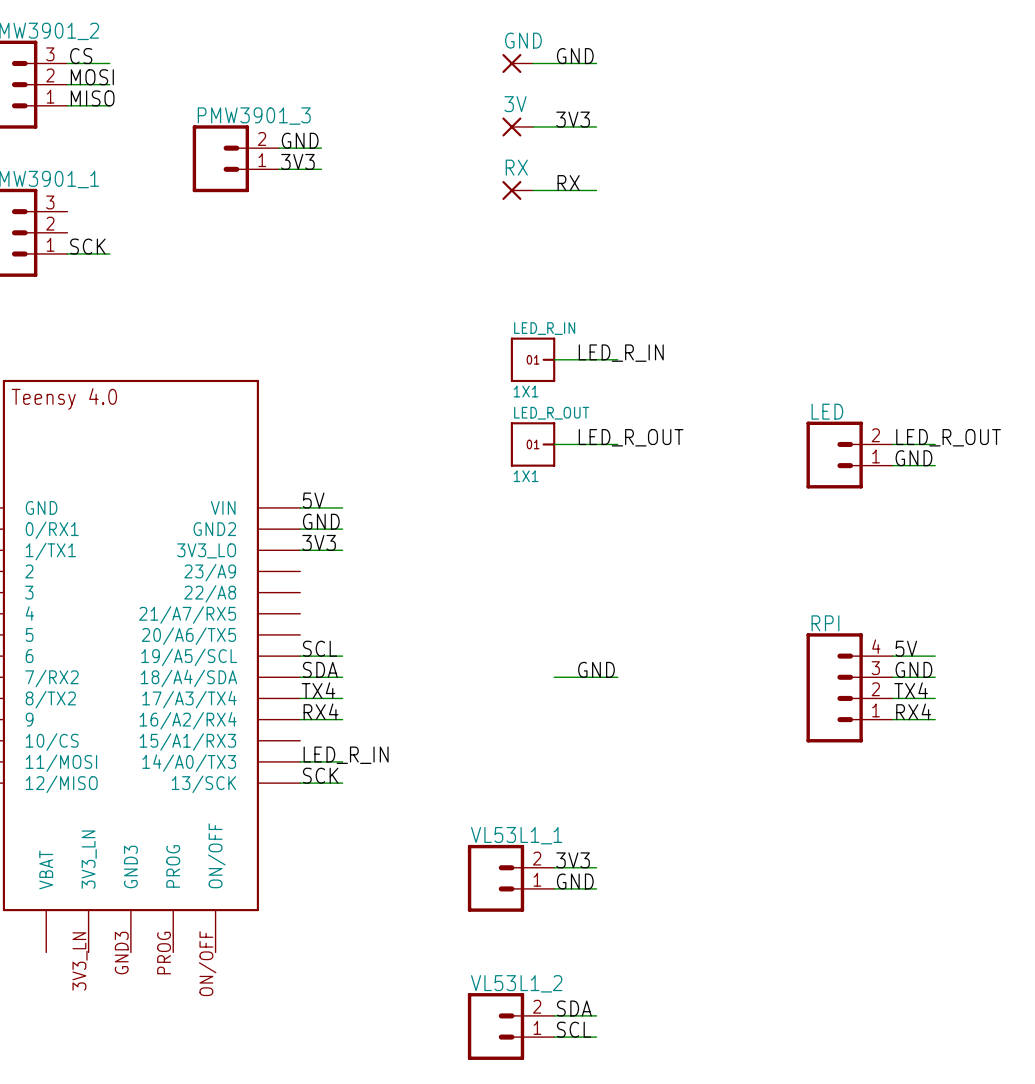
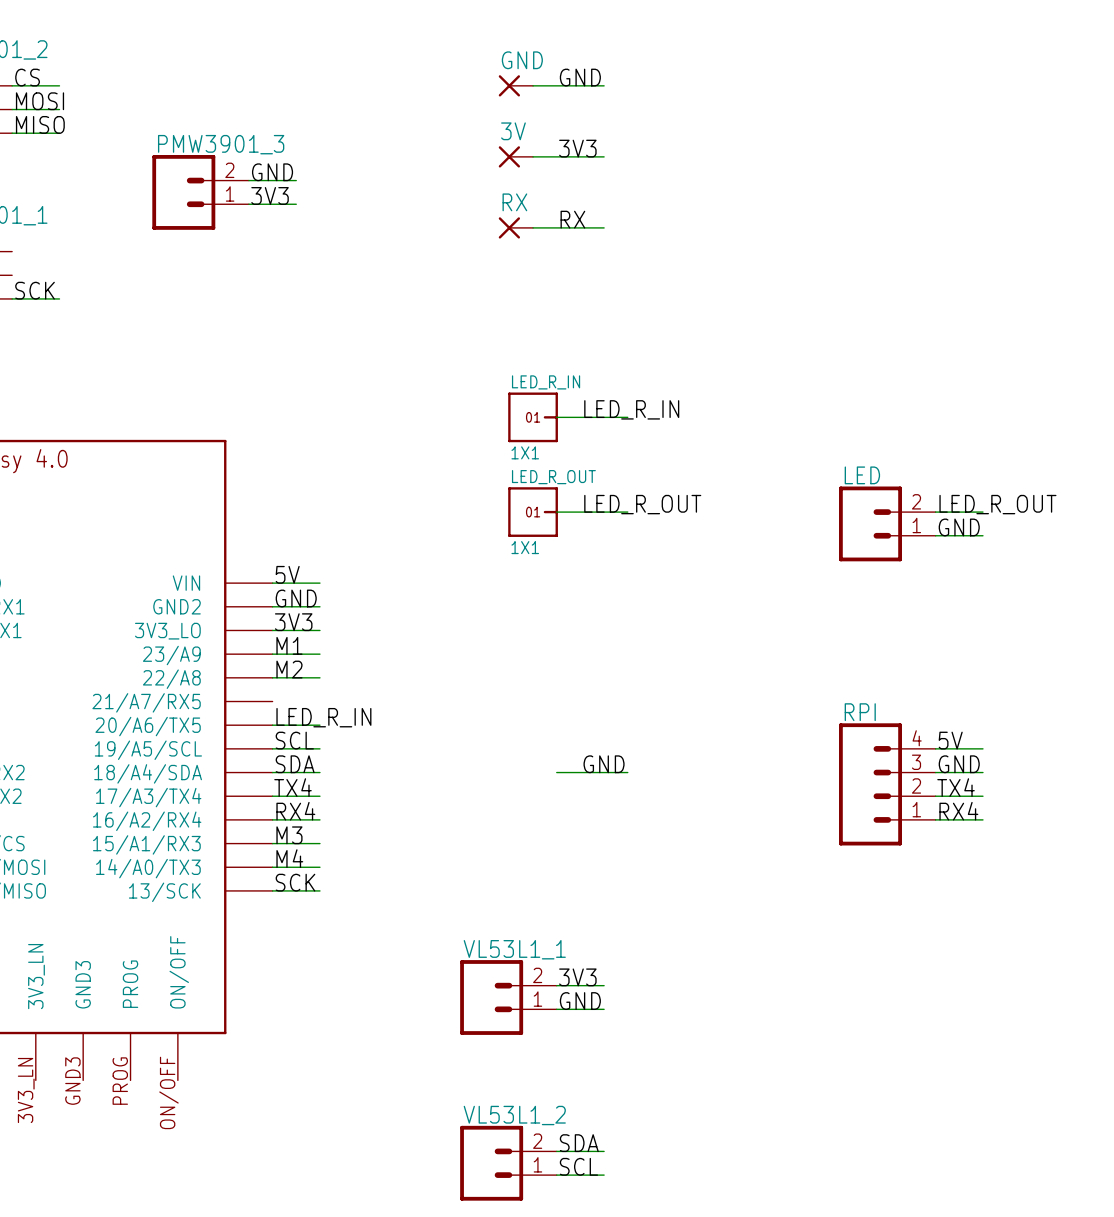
label: none -> M1 (289, 645)
wire: none -> (272, 654) (319, 654)
label: none -> M2 (289, 669)
wire: none -> (272, 677) (319, 677)
label: none -> LED_R_IN (323, 717)
wire: none -> (272, 725) (319, 725)
label: none -> M3 (289, 835)
wire: none -> (272, 843) (319, 843)
label: LED_R_IN (346, 755) -> M4 (289, 858)

